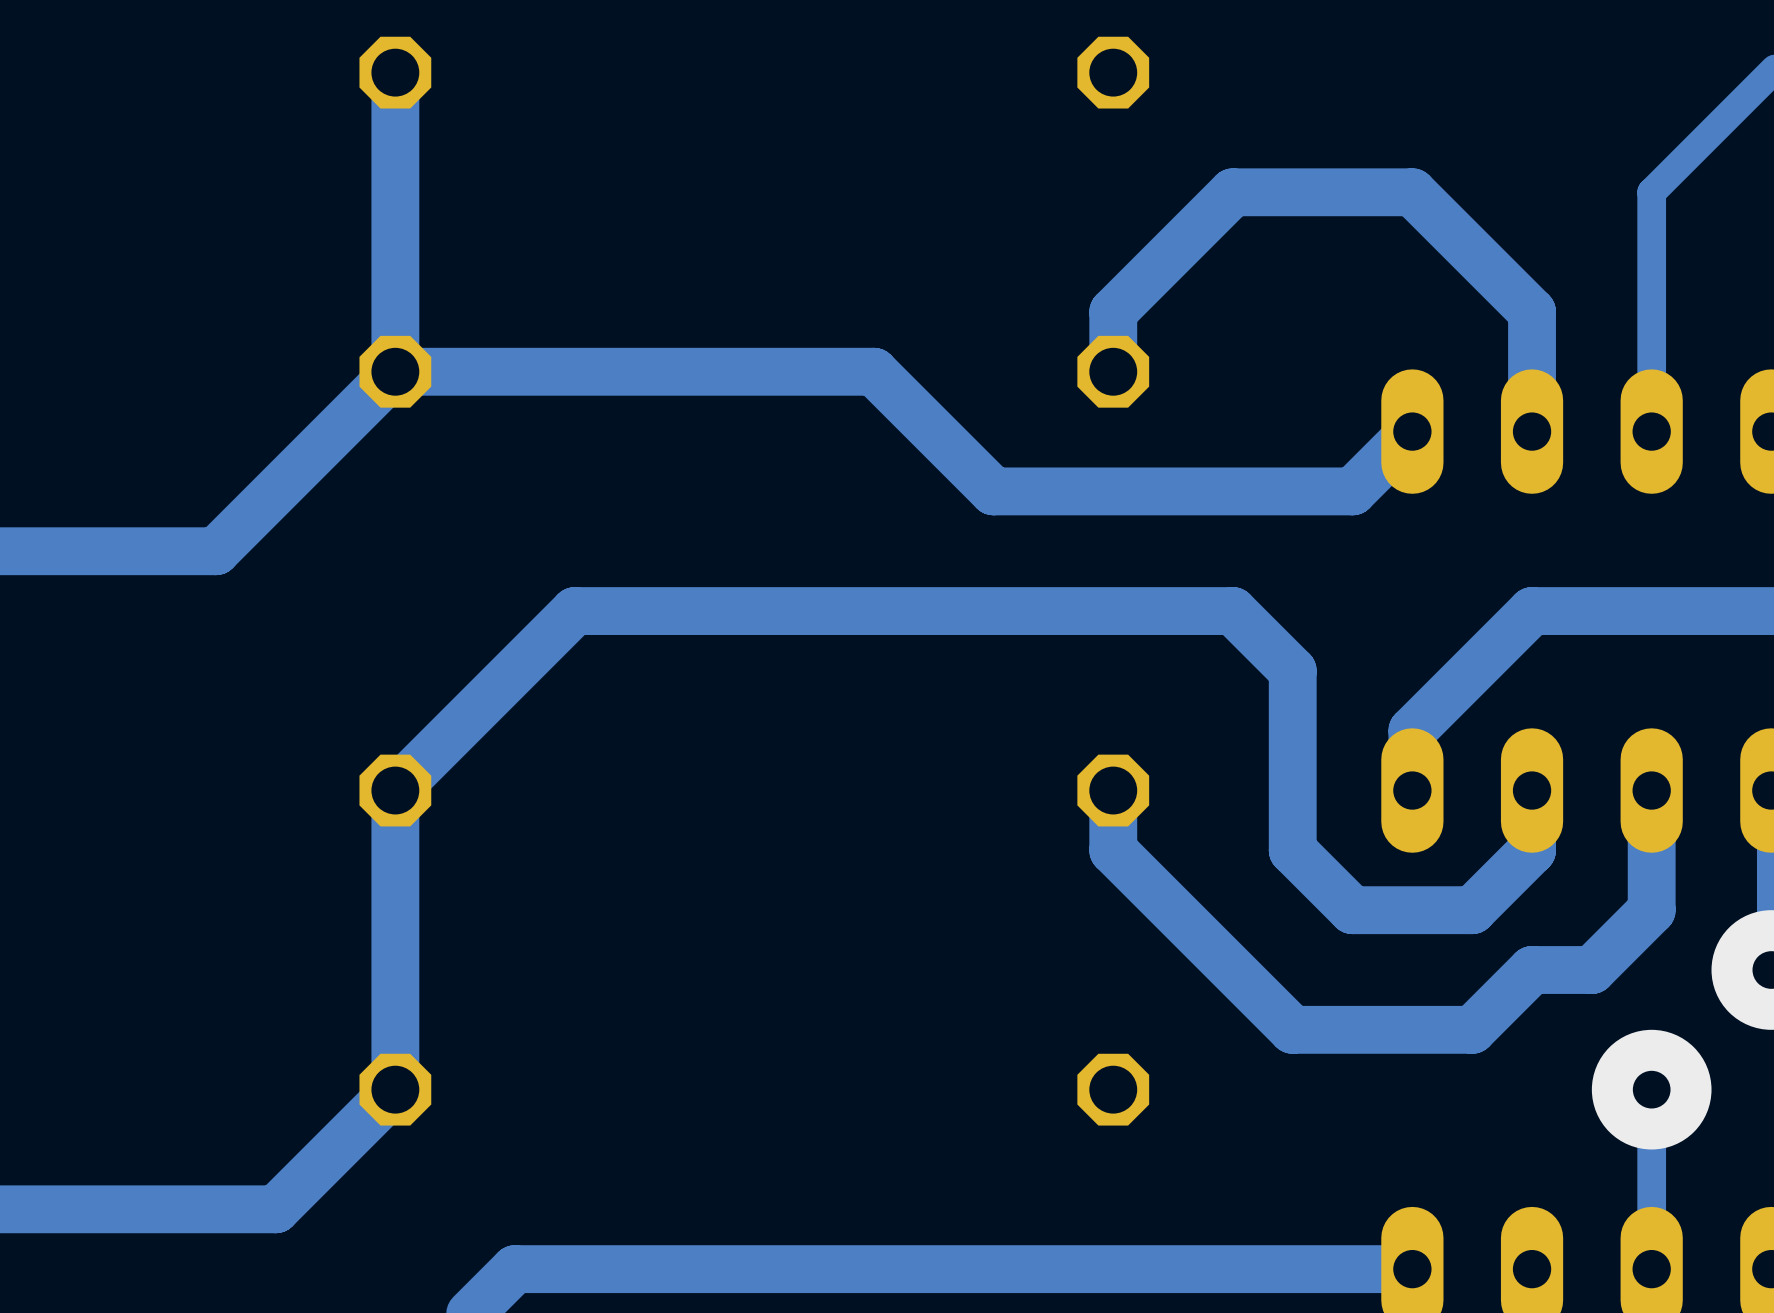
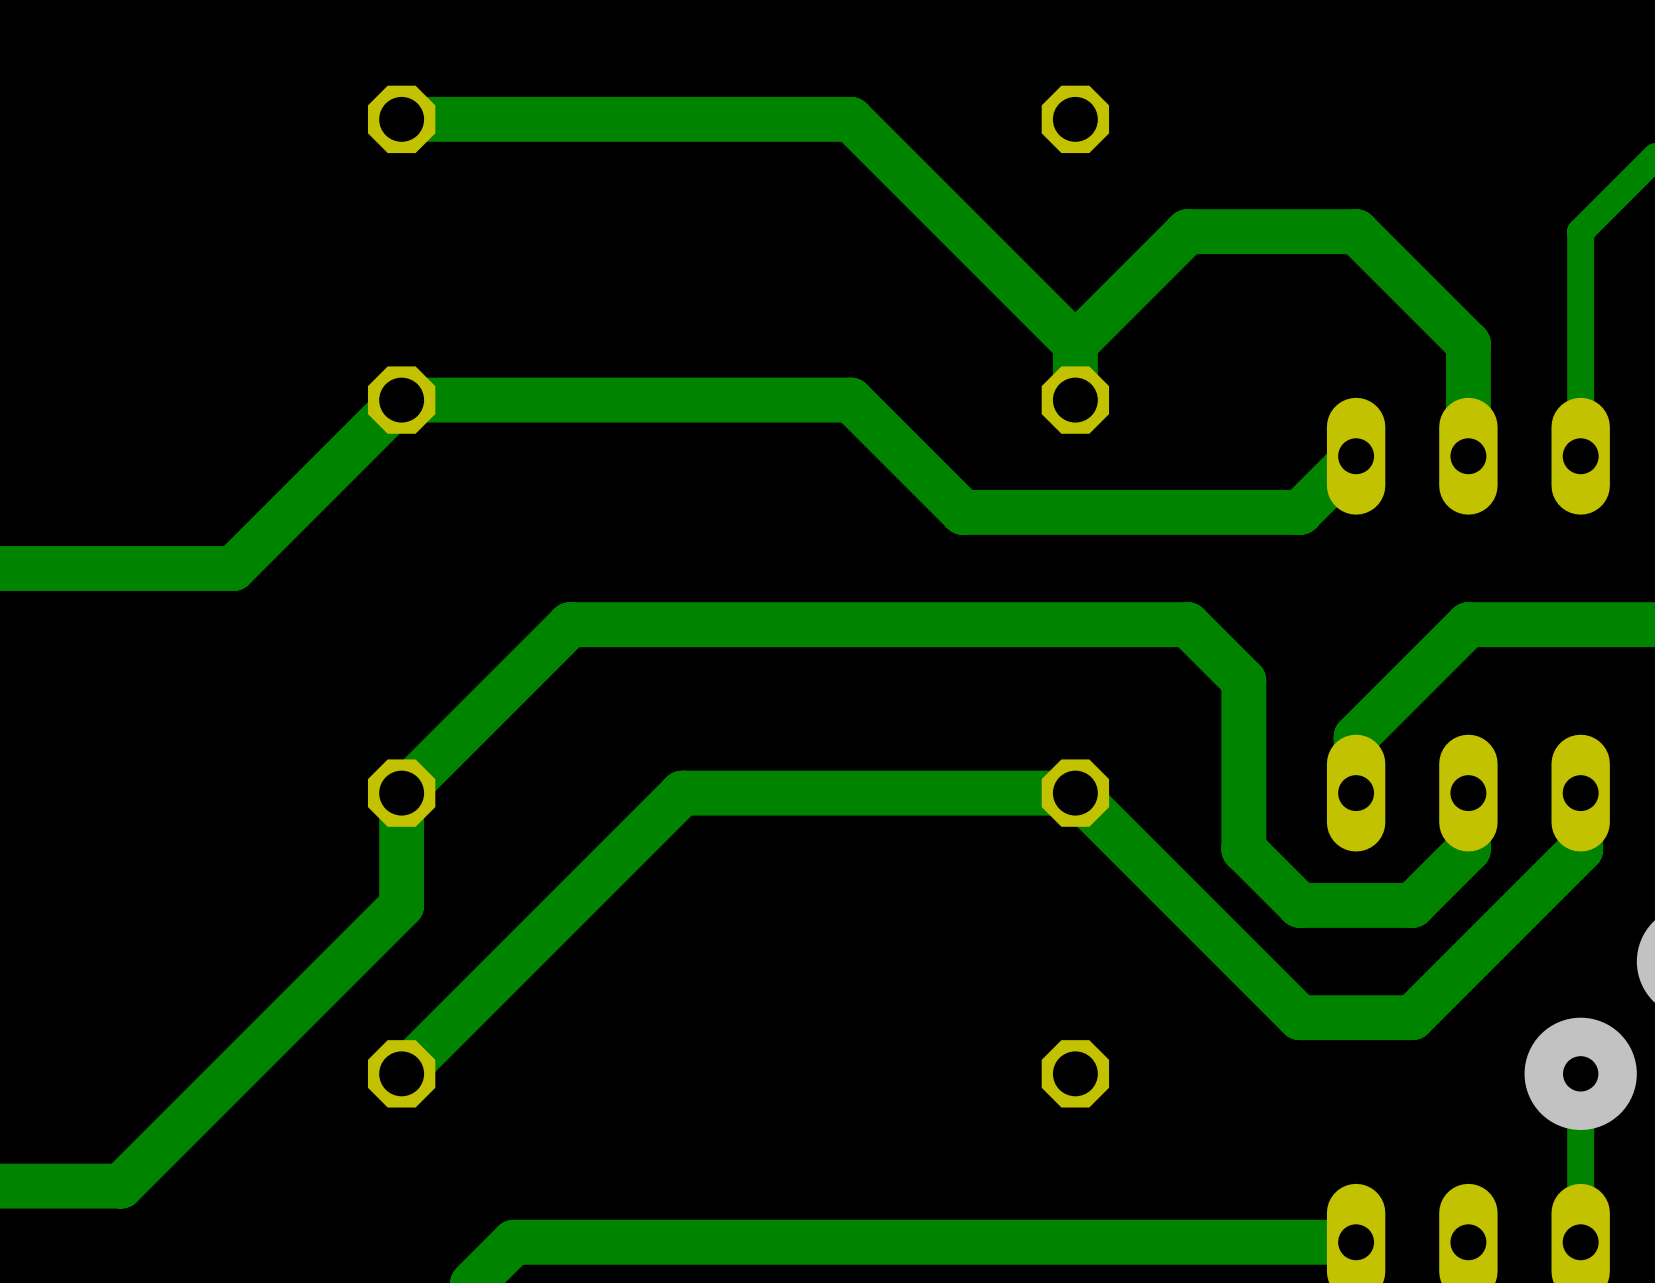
track: (395, 72) (395, 371) -> (401, 119) (850, 119) (1075, 343)
track: (1113, 790) (1113, 850) (1292, 1029) (1352, 1029) -> (401, 1073) (682, 793) (1075, 793) (1299, 1017)
track: (1651, 850) (1651, 910) (1591, 970) (1532, 970) -> (1580, 849) (1468, 961)
track: (395, 910) (395, 1089) (275, 1209) (96, 1209) -> (401, 905) (120, 1186)

